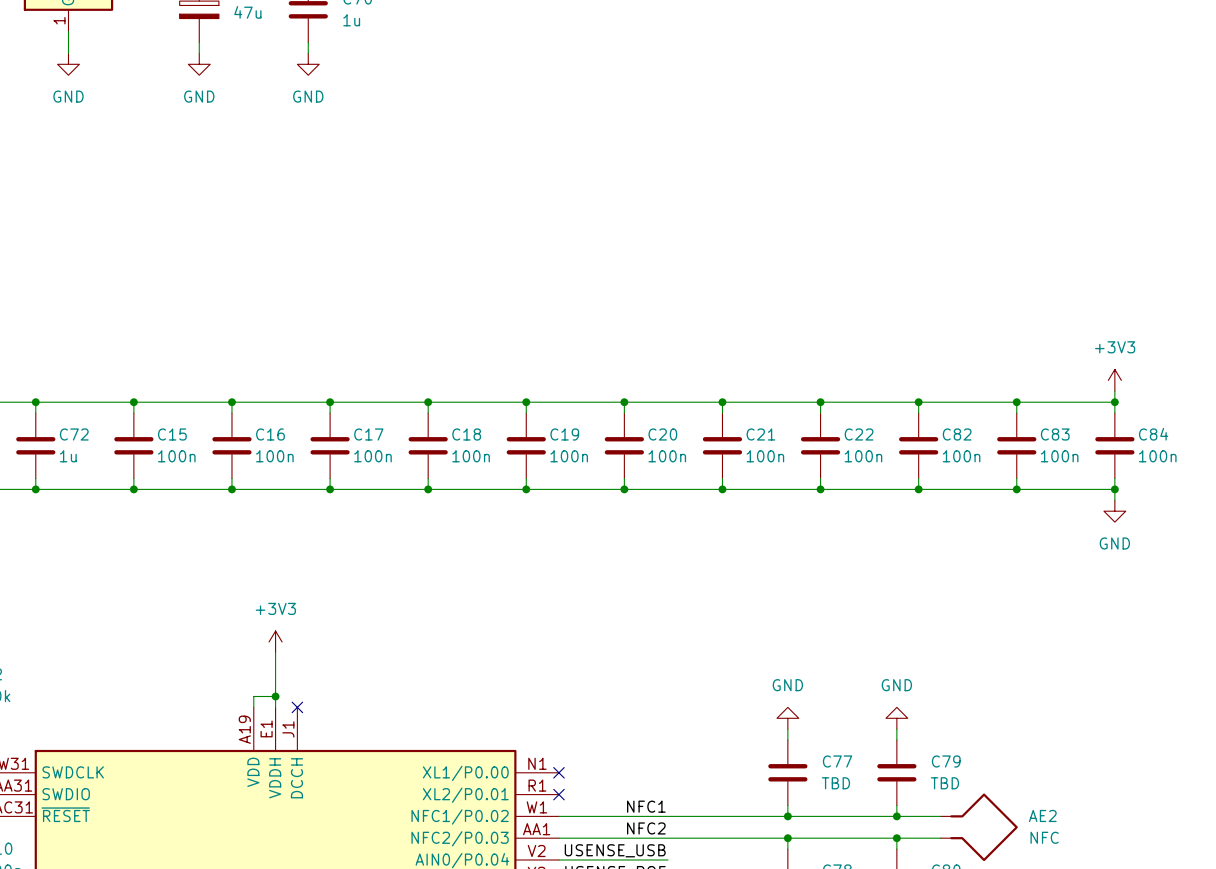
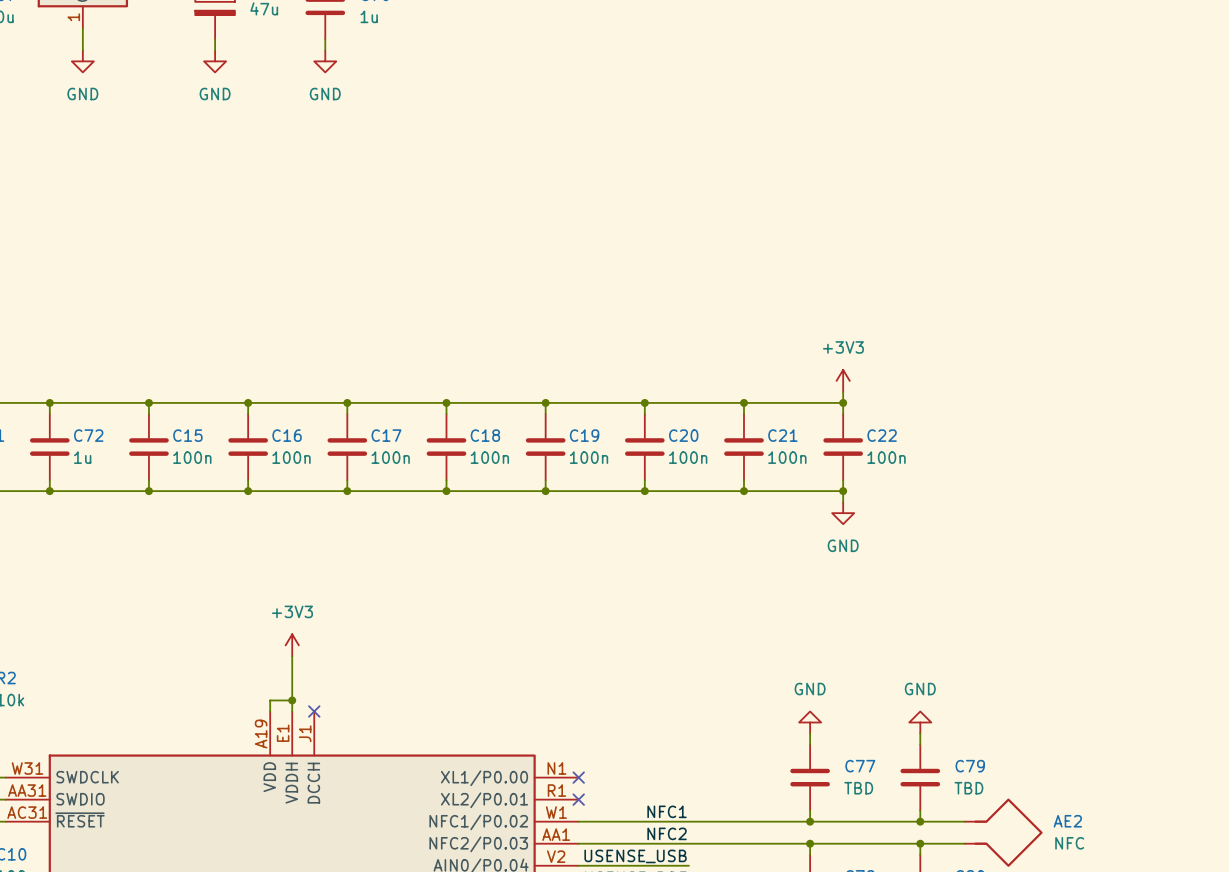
power symbol: none -> +3V3 (843, 380)
power symbol: +3V3 (1114, 380) -> none
wire: (1114, 391) (1114, 413) -> none
wire: (820, 402) (1114, 402) -> (843, 402) (843, 391)
wire: (918, 402) (918, 413) -> none
junction: (918, 402) -> none
wire: (1016, 402) (1016, 413) -> none
junction: (1016, 402) -> none
junction: (1114, 402) -> none
C82: 100n (918, 445) -> none
C83: 100n (1016, 445) -> none
C84: 100n (1114, 445) -> none
wire: (918, 478) (918, 489) -> none
wire: (1016, 478) (1016, 489) -> none
wire: (1114, 478) (1114, 500) -> none
wire: (820, 489) (1114, 489) -> (843, 491) (843, 502)
junction: (918, 489) -> none
junction: (1016, 489) -> none
junction: (1114, 489) -> none
power symbol: none -> GND (843, 513)
power symbol: GND (1114, 511) -> none

